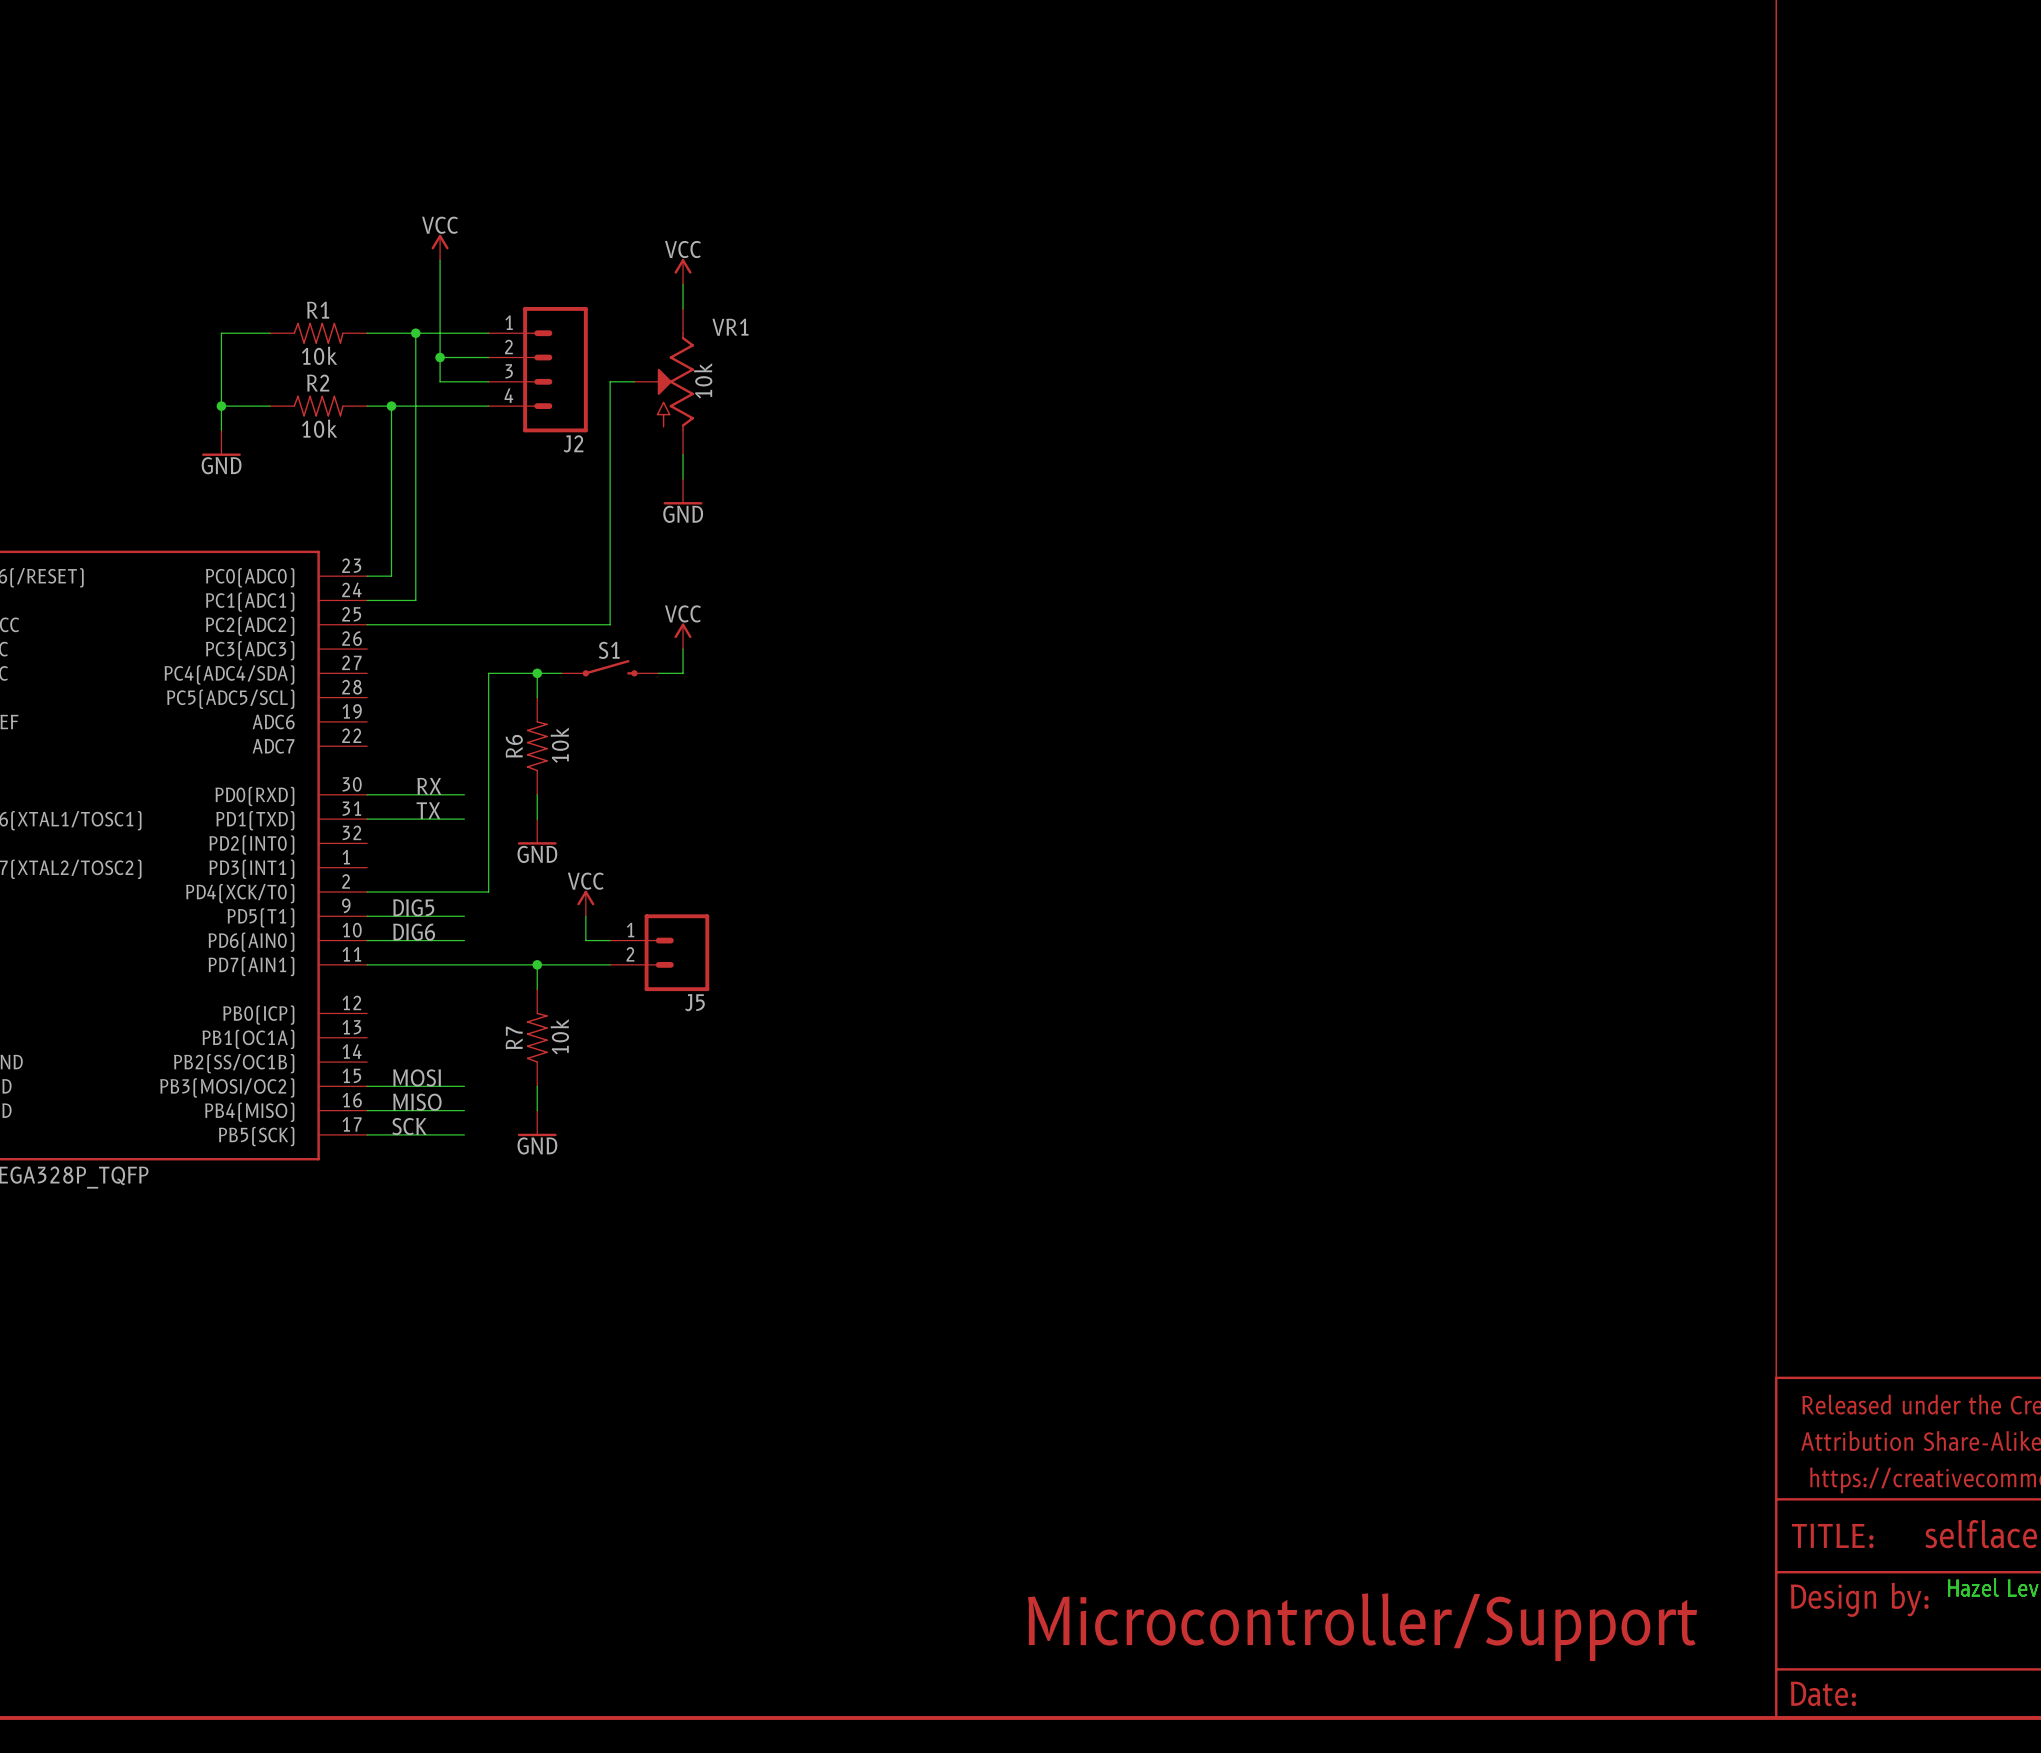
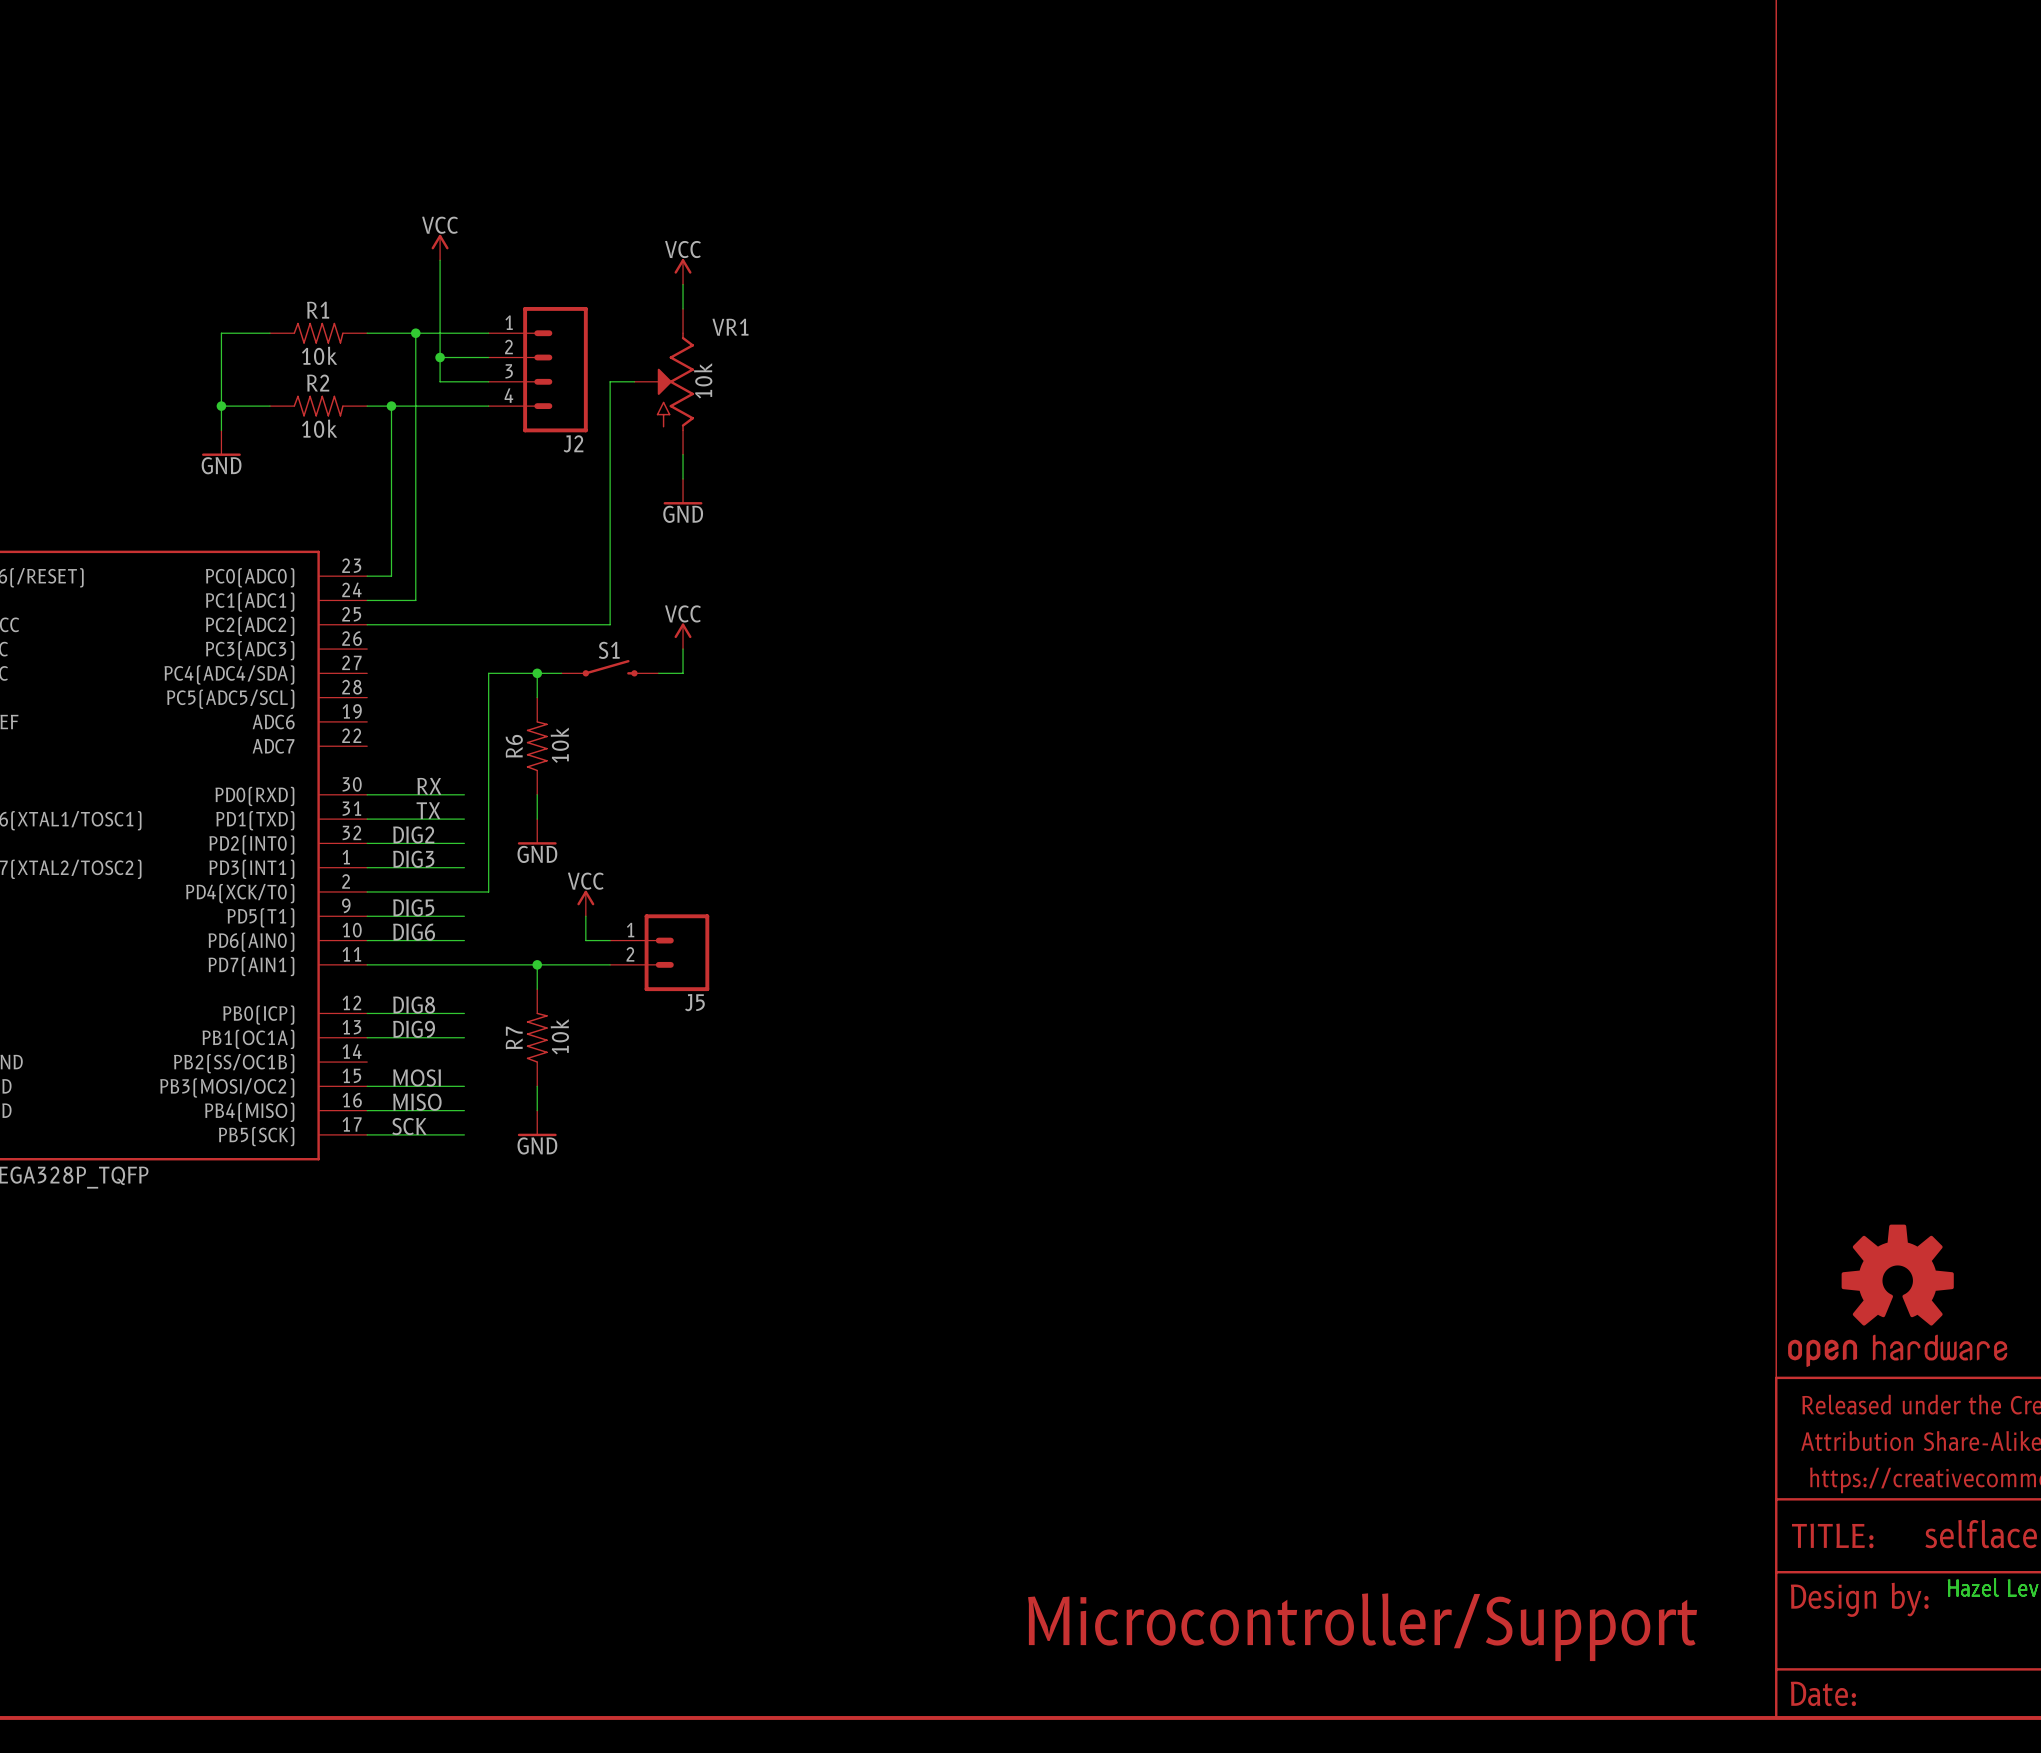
label: none -> DIG2 (413, 834)
wire: none -> (367, 843) (464, 843)
label: none -> DIG3 (413, 859)
wire: none -> (367, 867) (464, 867)
label: none -> DIG8 (414, 1005)
wire: none -> (367, 1013) (464, 1013)
label: none -> DIG9 (414, 1029)
wire: none -> (367, 1037) (464, 1037)
part: none -> (1897, 1295)

